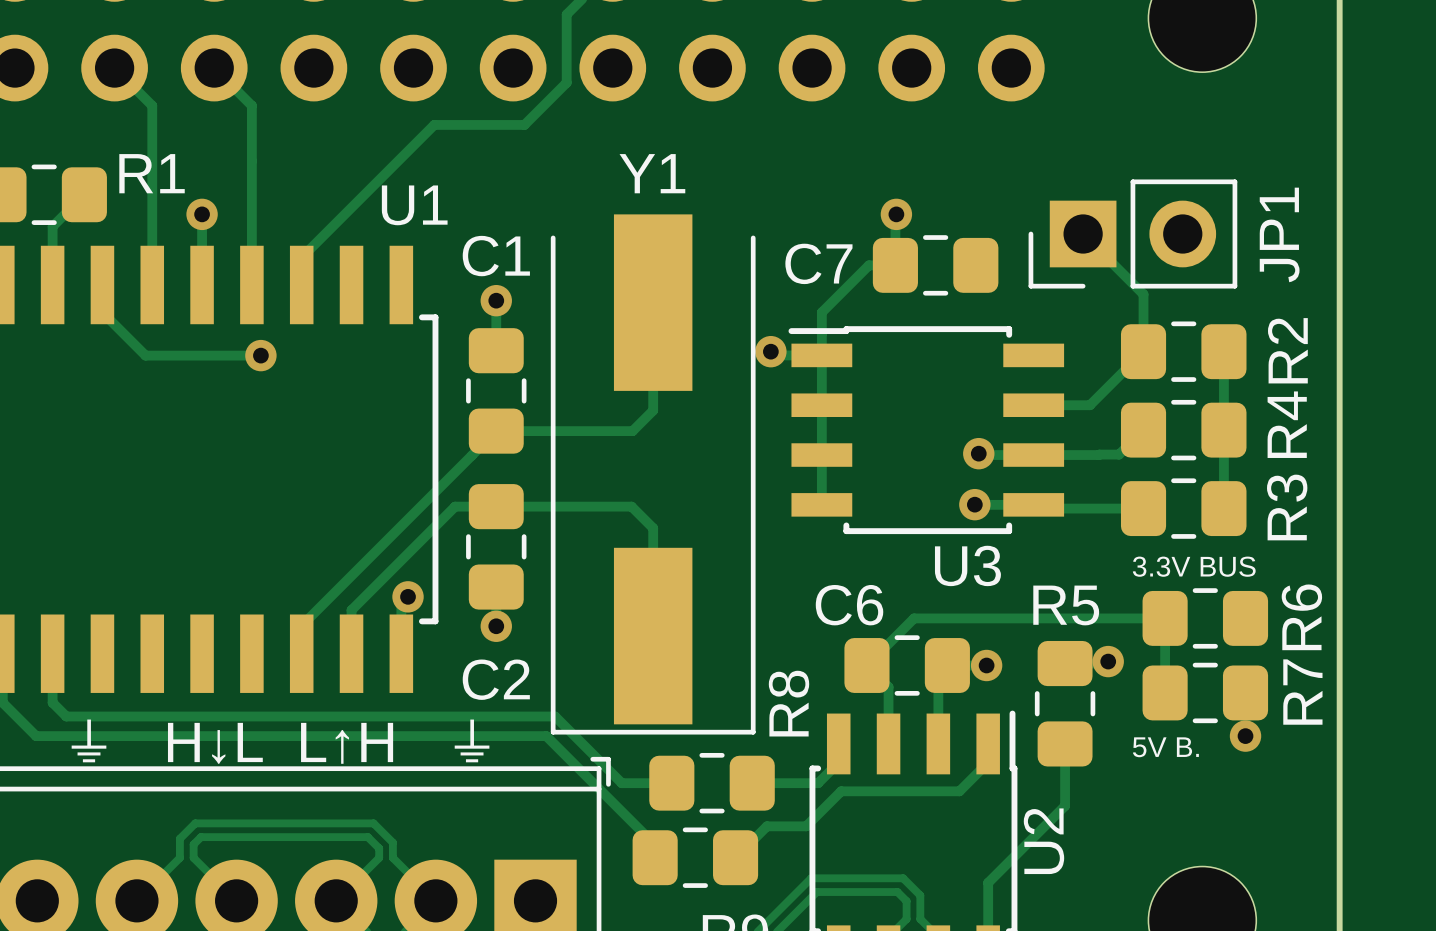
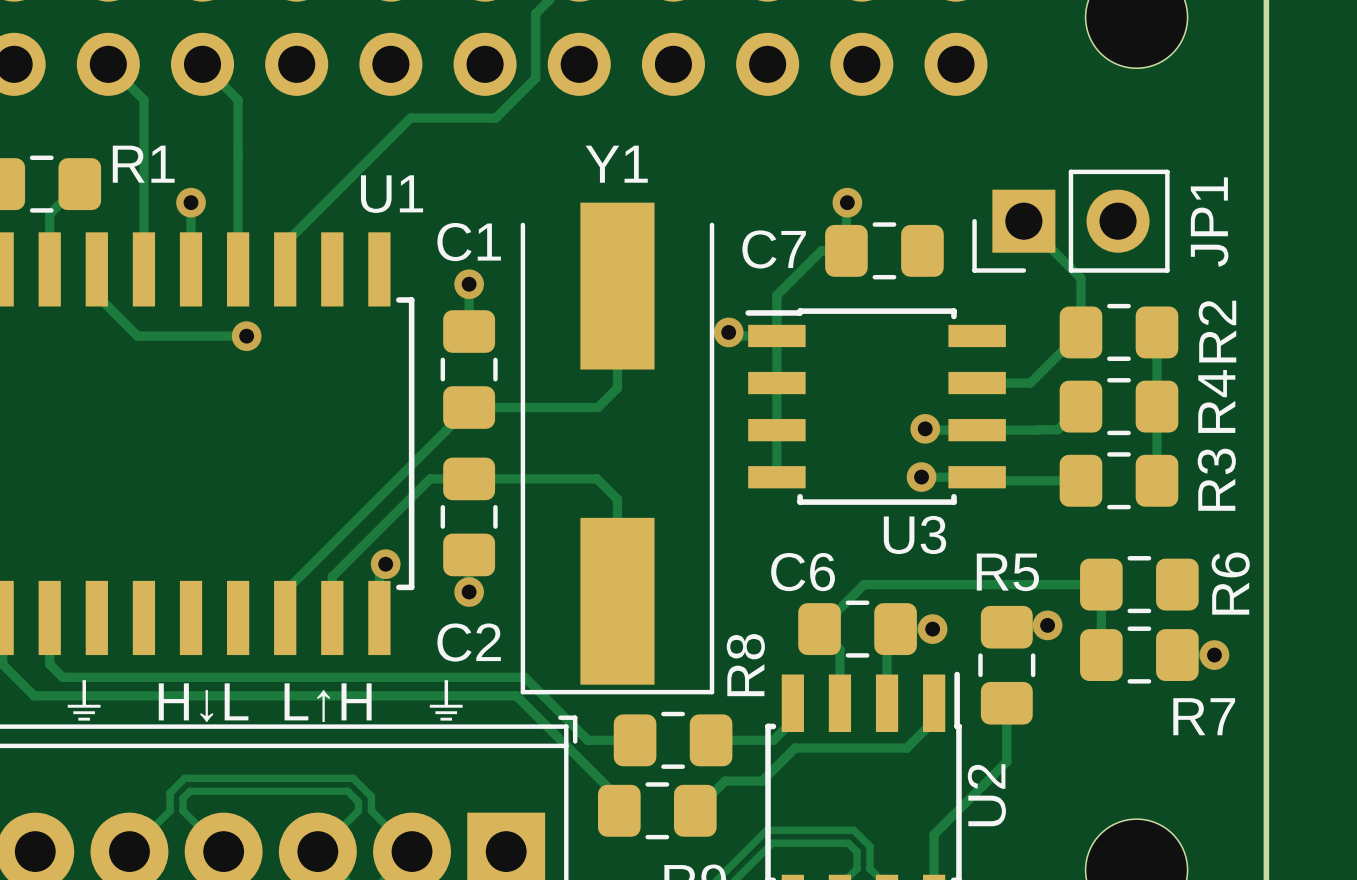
text: 3.3V BUS (1194, 566) -> none
R7 name rotation: 0° (1302, 692) -> 90° clockwise (1204, 716)
via position: (1245, 736) -> (1214, 655)
text: 5V B. (1165, 747) -> none

